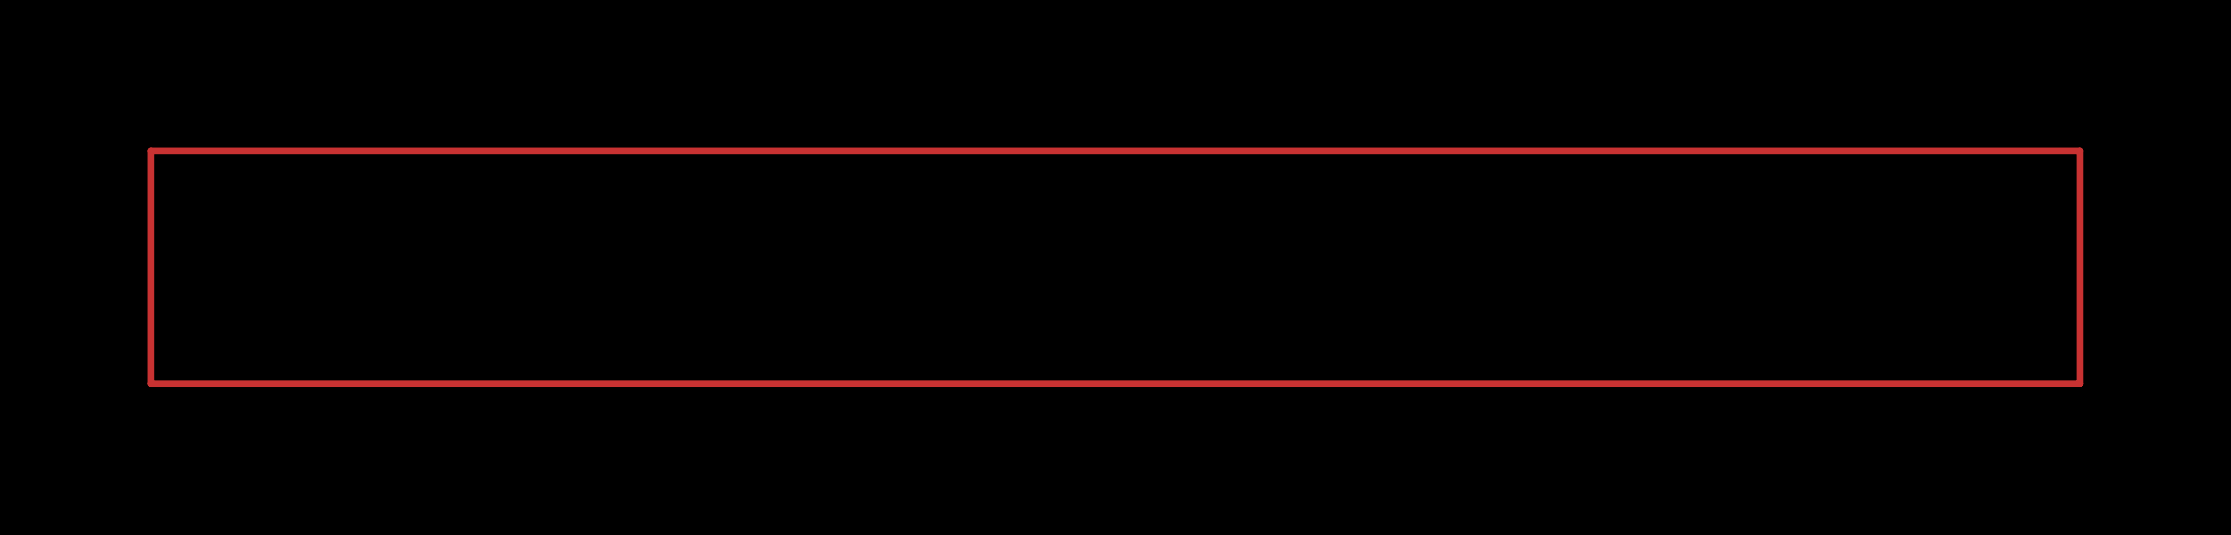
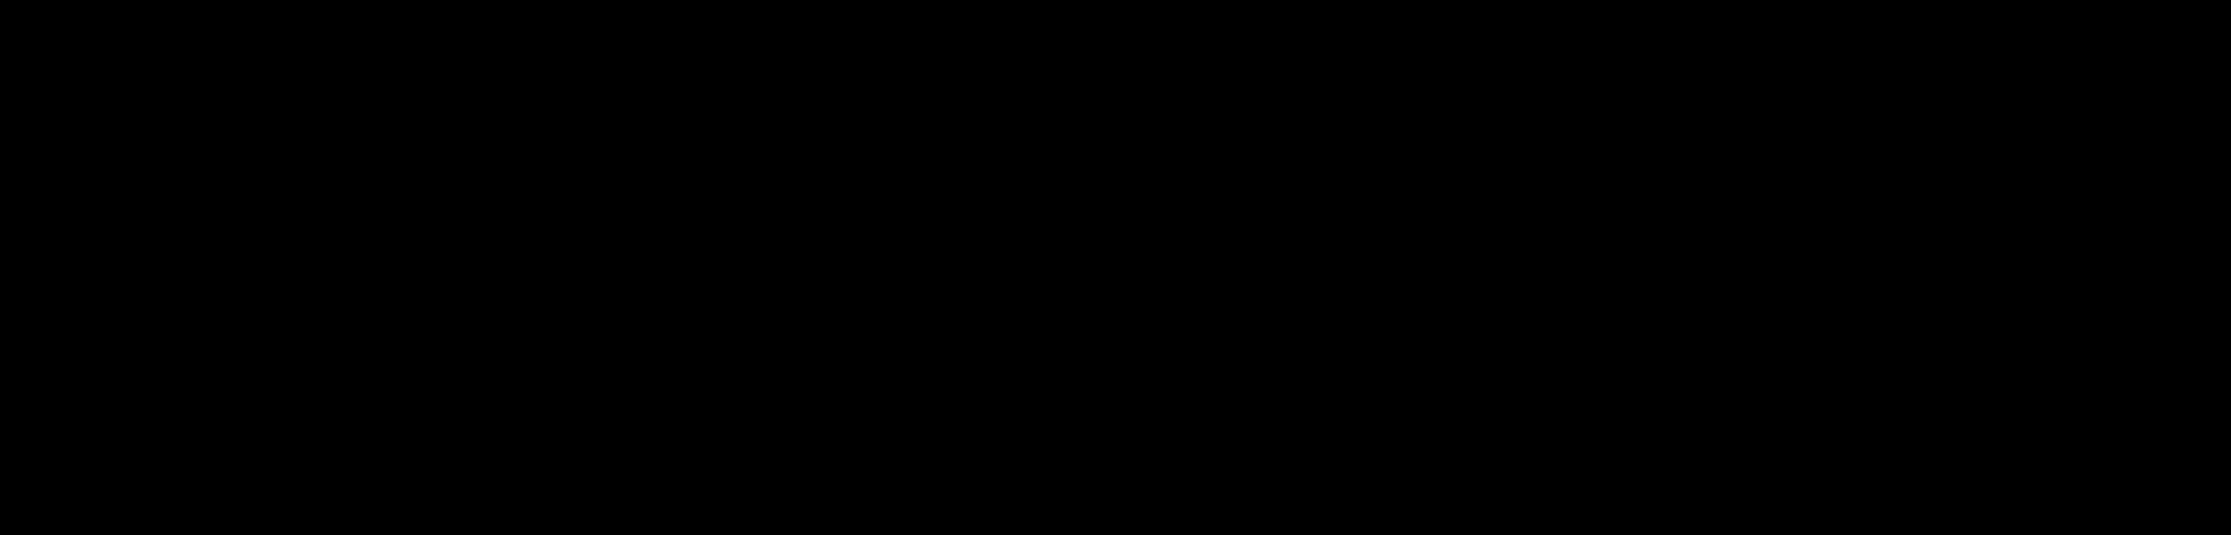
top track: (150, 150) (2079, 150) (2079, 383) (150, 383) (150, 150) -> none

